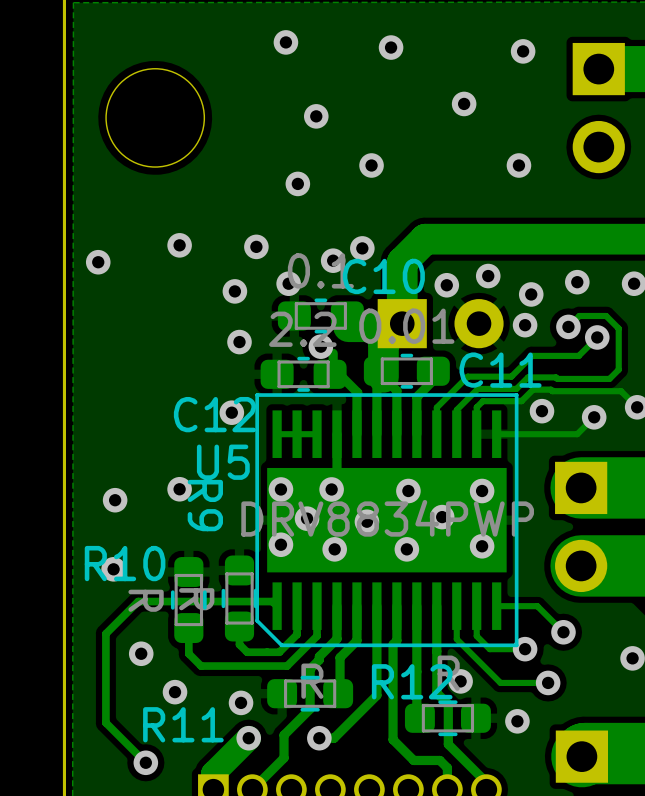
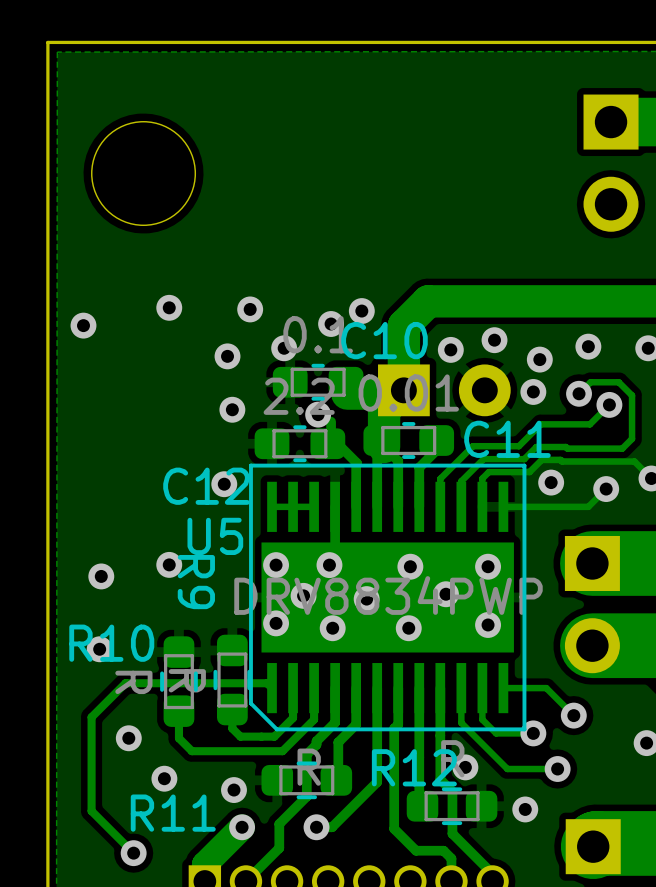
via: (285, 42) -> none
via: (391, 47) -> none
via: (523, 51) -> none
via: (464, 103) -> none
via: (316, 116) -> none
via: (371, 165) -> none
via: (518, 165) -> none
via: (297, 183) -> none

